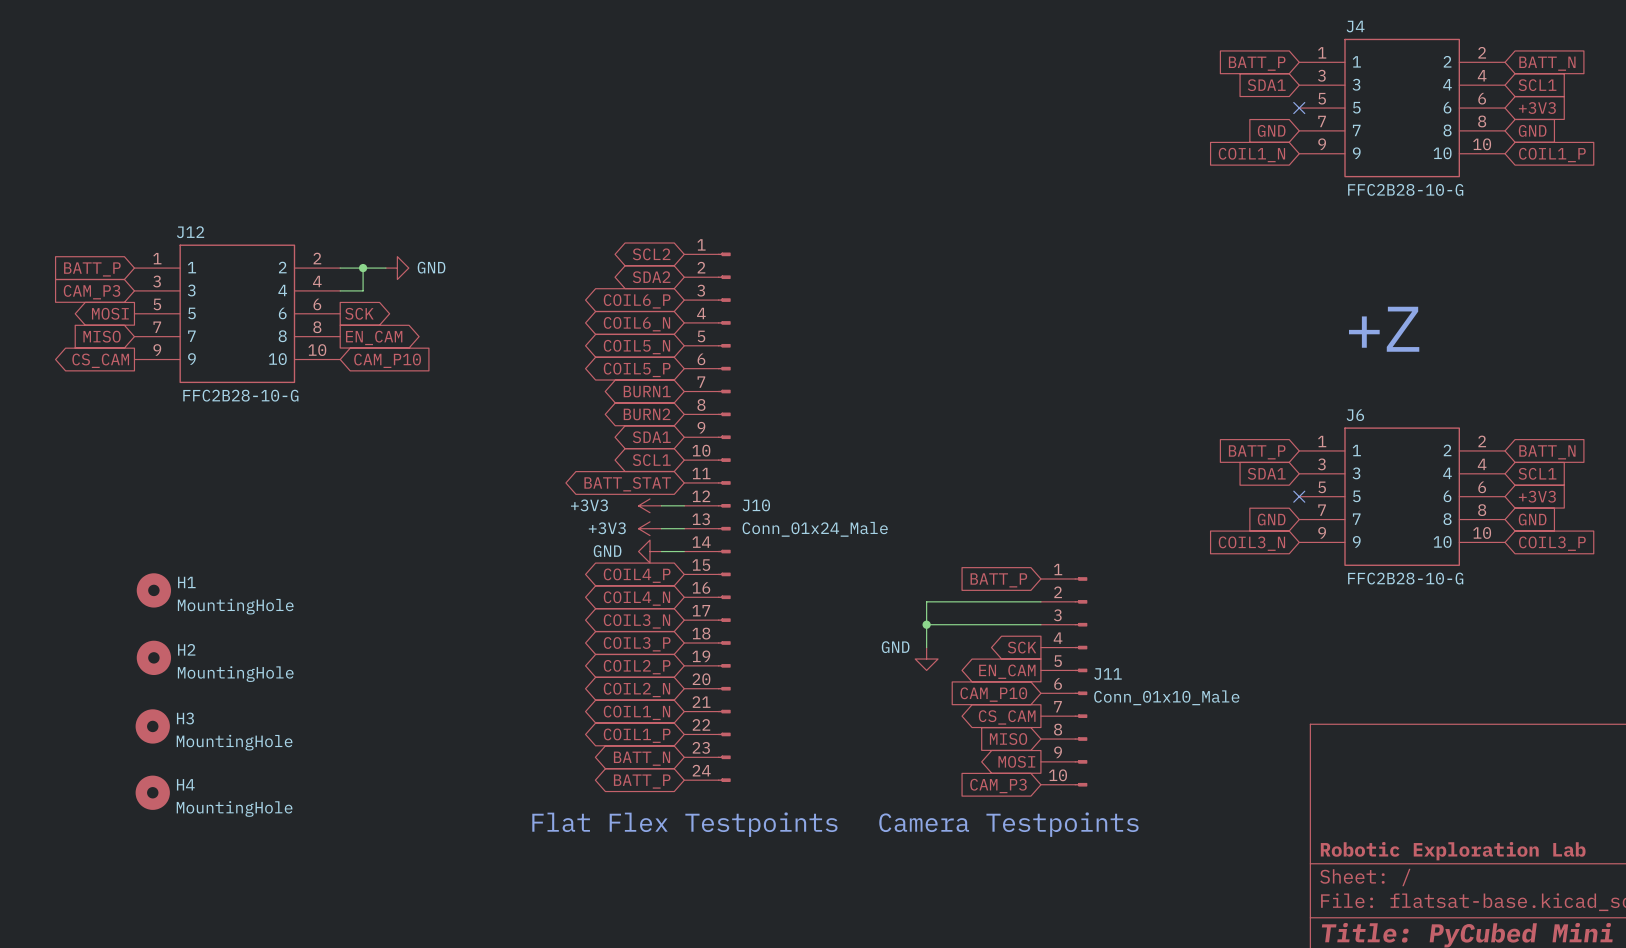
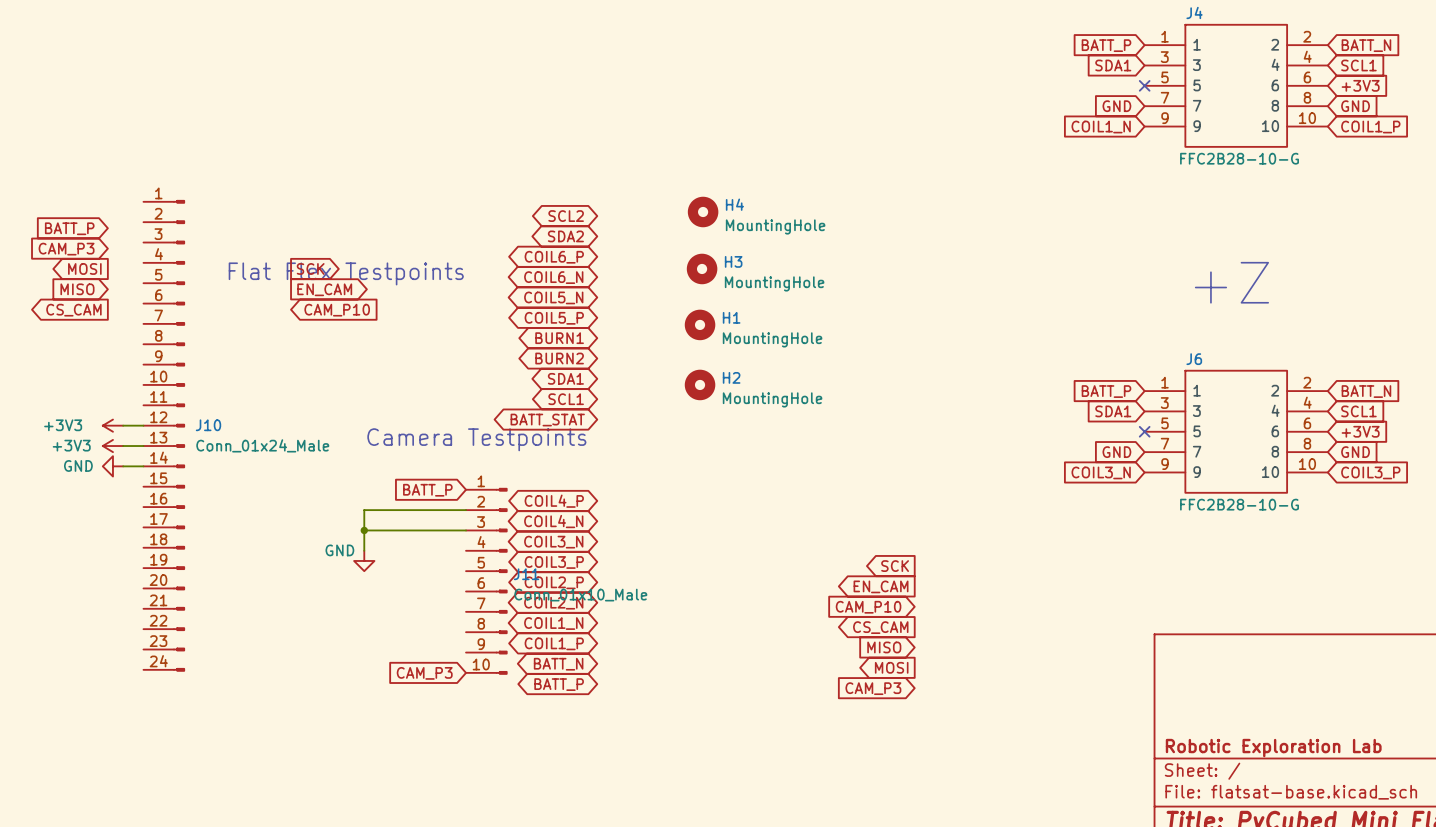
wire: (340, 268) (385, 268) -> none
wire: (363, 268) (363, 290) (340, 290) -> none
junction: (363, 268) -> none
power symbol: GND (397, 268) -> none
J12: FFC2B28-10-G (237, 313) -> none
text: none -> Flat Flex Testpoints (346, 273)
power symbol: none -> +3V3 (112, 425)
wire: none -> (123, 425) (143, 425)
text: none -> Camera Testpoints (476, 439)
power symbol: +3V3 (649, 505) -> none
wire: (661, 505) (684, 505) -> none
power symbol: none -> +3V3 (112, 446)
wire: none -> (123, 446) (143, 446)
J10 position: (707, 517) -> (164, 435)
power symbol: +3V3 (649, 528) -> none
wire: (661, 528) (684, 528) -> none
power symbol: none -> GND (112, 466)
wire: none -> (123, 466) (143, 466)
power symbol: GND (649, 551) -> none
wire: (661, 551) (684, 551) -> none
global label: none -> BATT_P (427, 490)
global label: BATT_P (998, 580) -> none
wire: none -> (466, 510) (364, 510) (364, 550)
H1 position: (153, 590) -> (700, 324)
wire: (1040, 601) (926, 601) (926, 647) -> none
wire: none -> (364, 530) (466, 530)
junction: none -> (364, 530)
wire: (926, 624) (1040, 624) -> none
junction: (926, 624) -> none
power symbol: none -> GND (364, 560)
H2 position: (153, 657) -> (700, 384)
power symbol: GND (926, 659) -> none
J11 position: (1064, 681) -> (486, 581)
H3 position: (152, 726) -> (702, 268)
global label: none -> CAM_P3 (424, 673)
H4 position: (152, 792) -> (703, 212)
text: Flat Flex Testpoints (684, 824) -> none
text: Camera Testpoints (1008, 824) -> none

